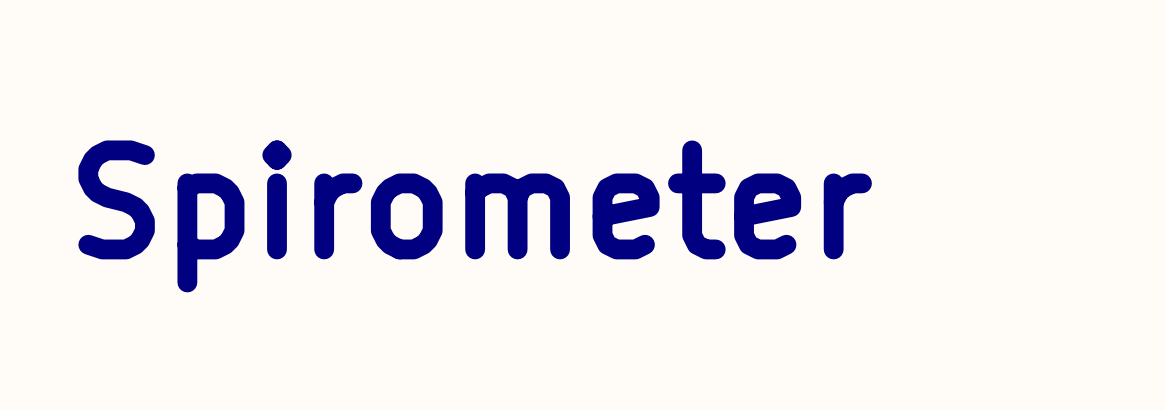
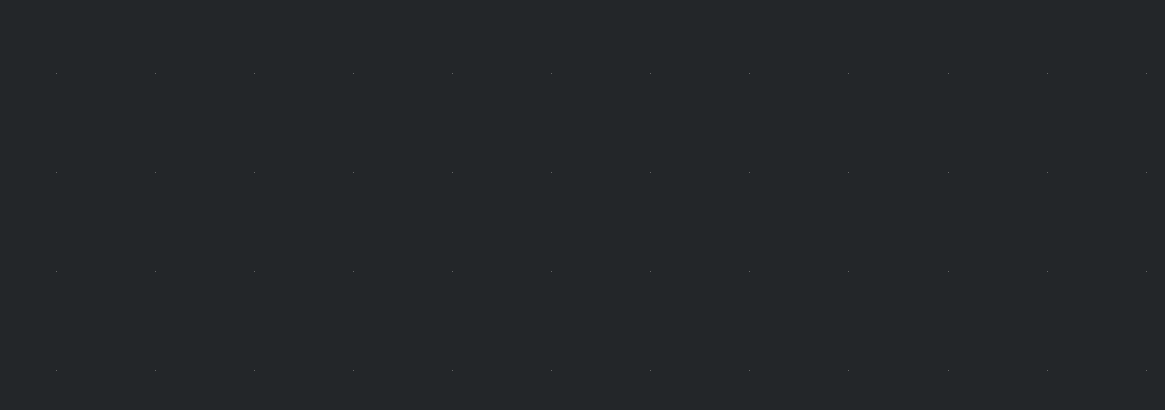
text: Spirometer (475, 216) -> none

